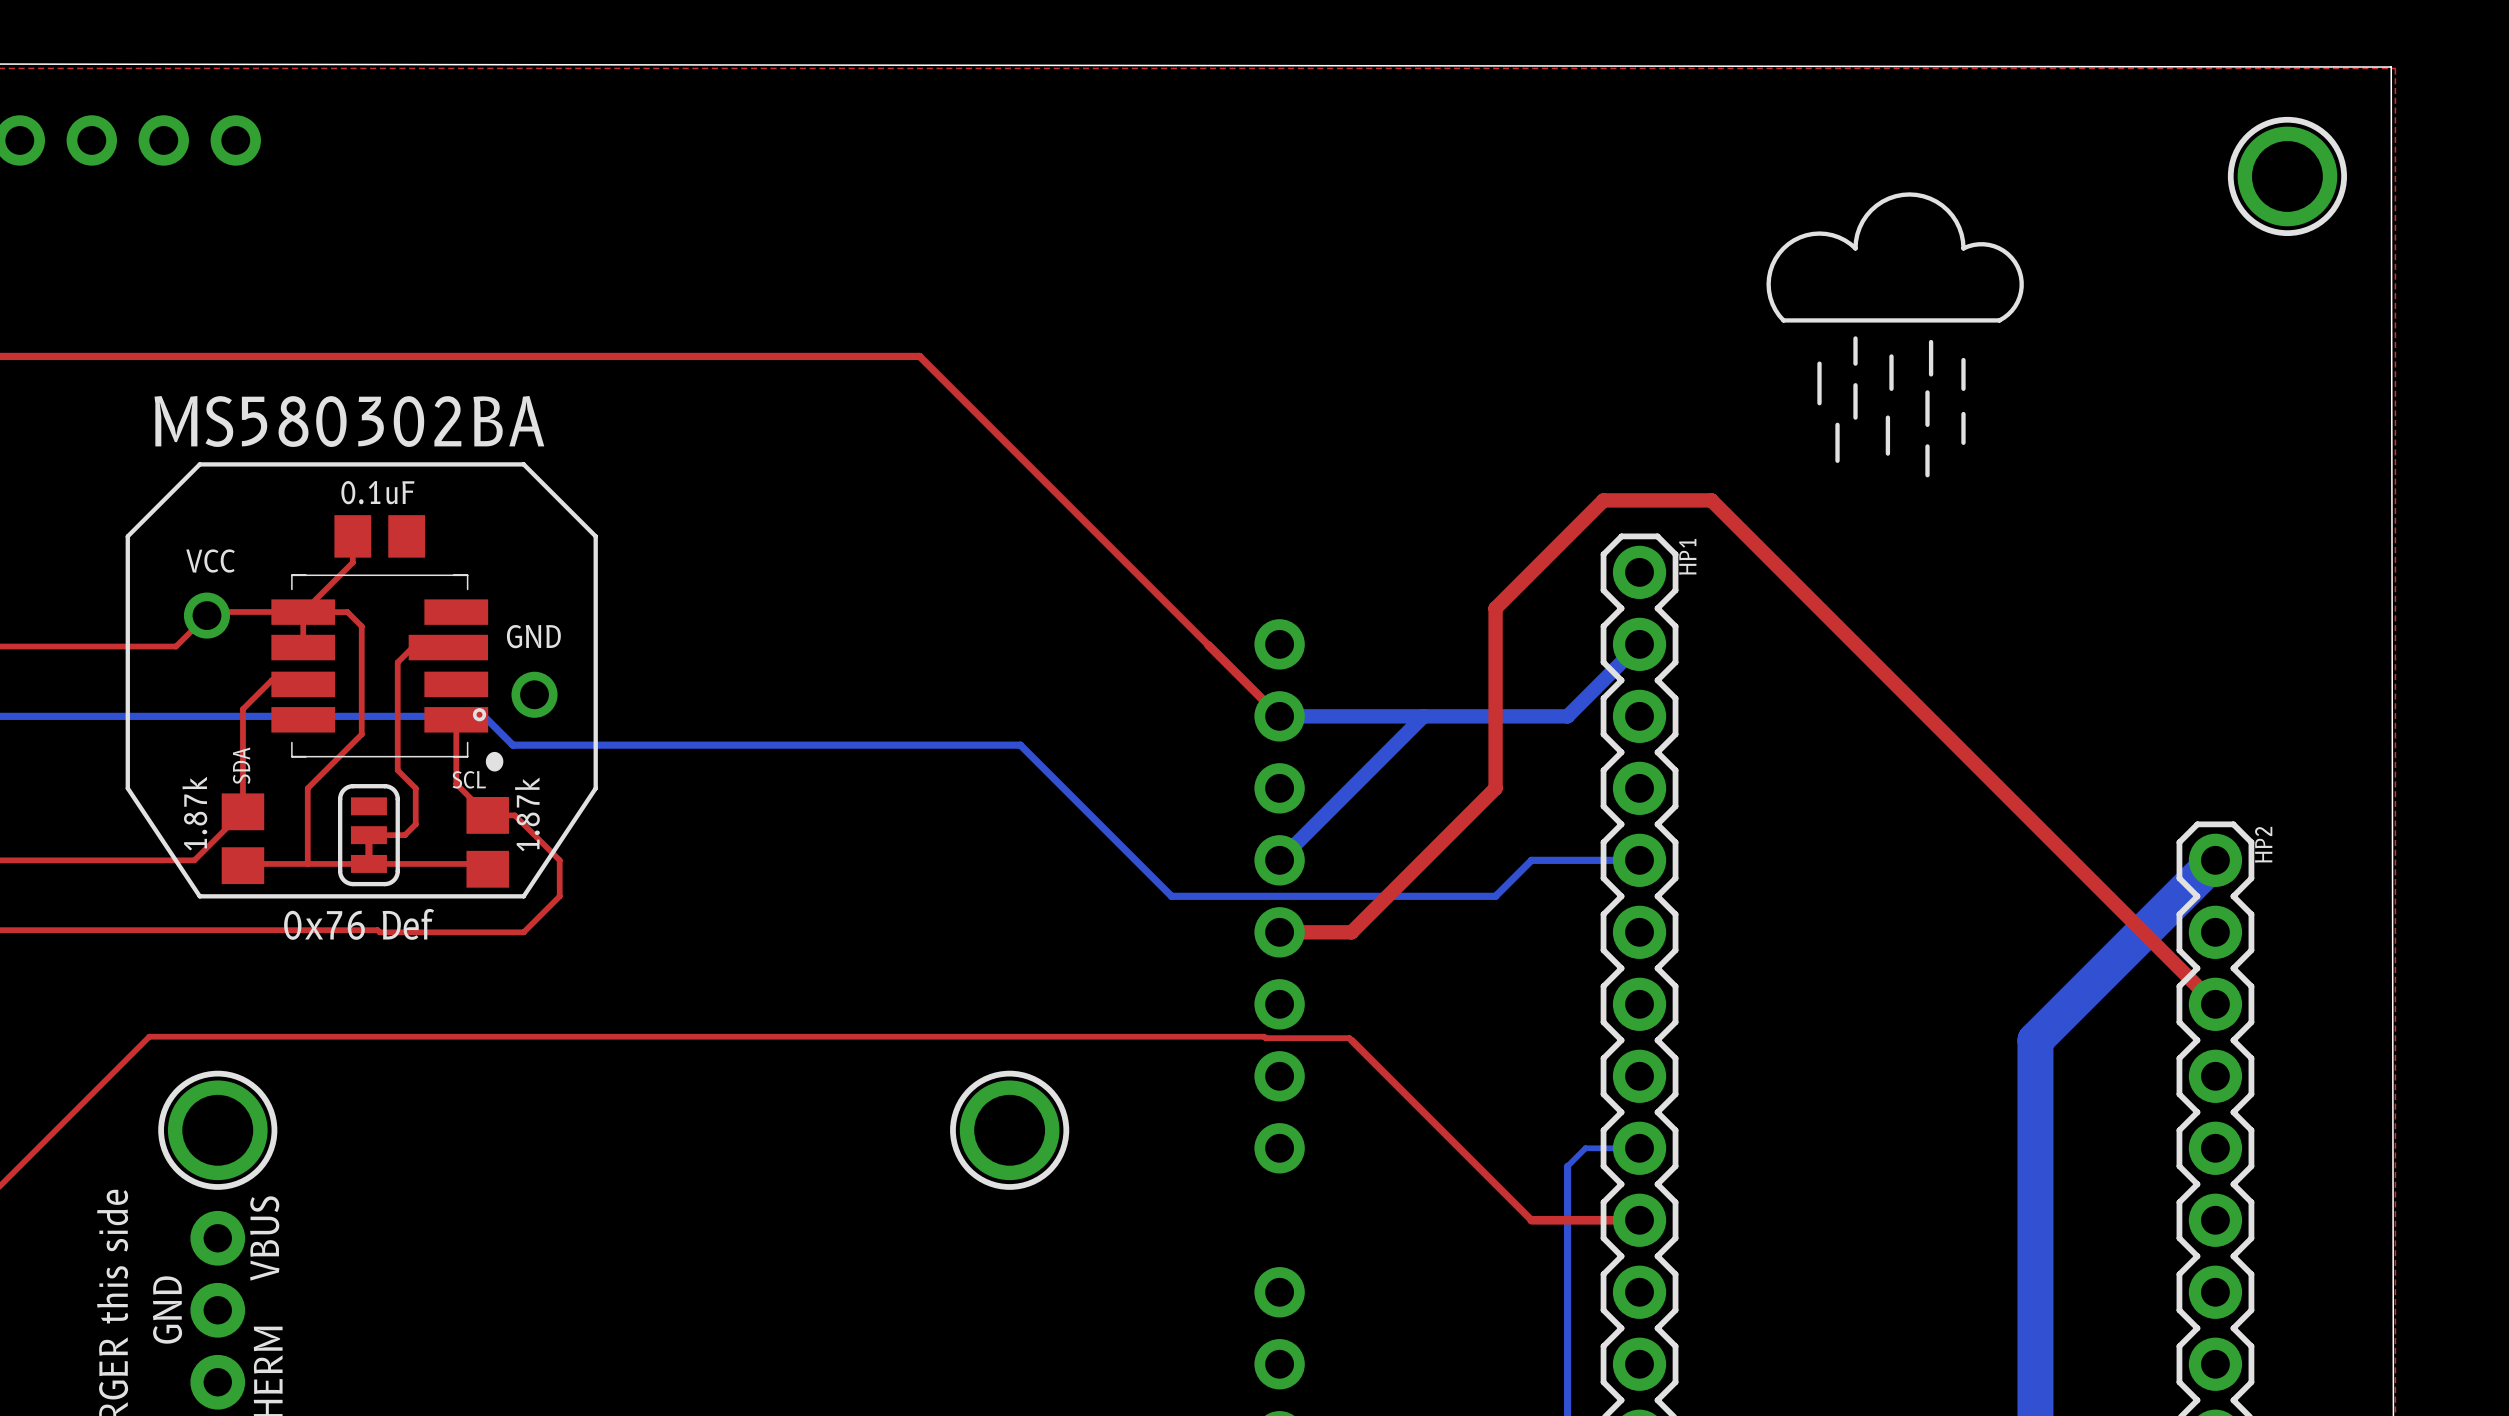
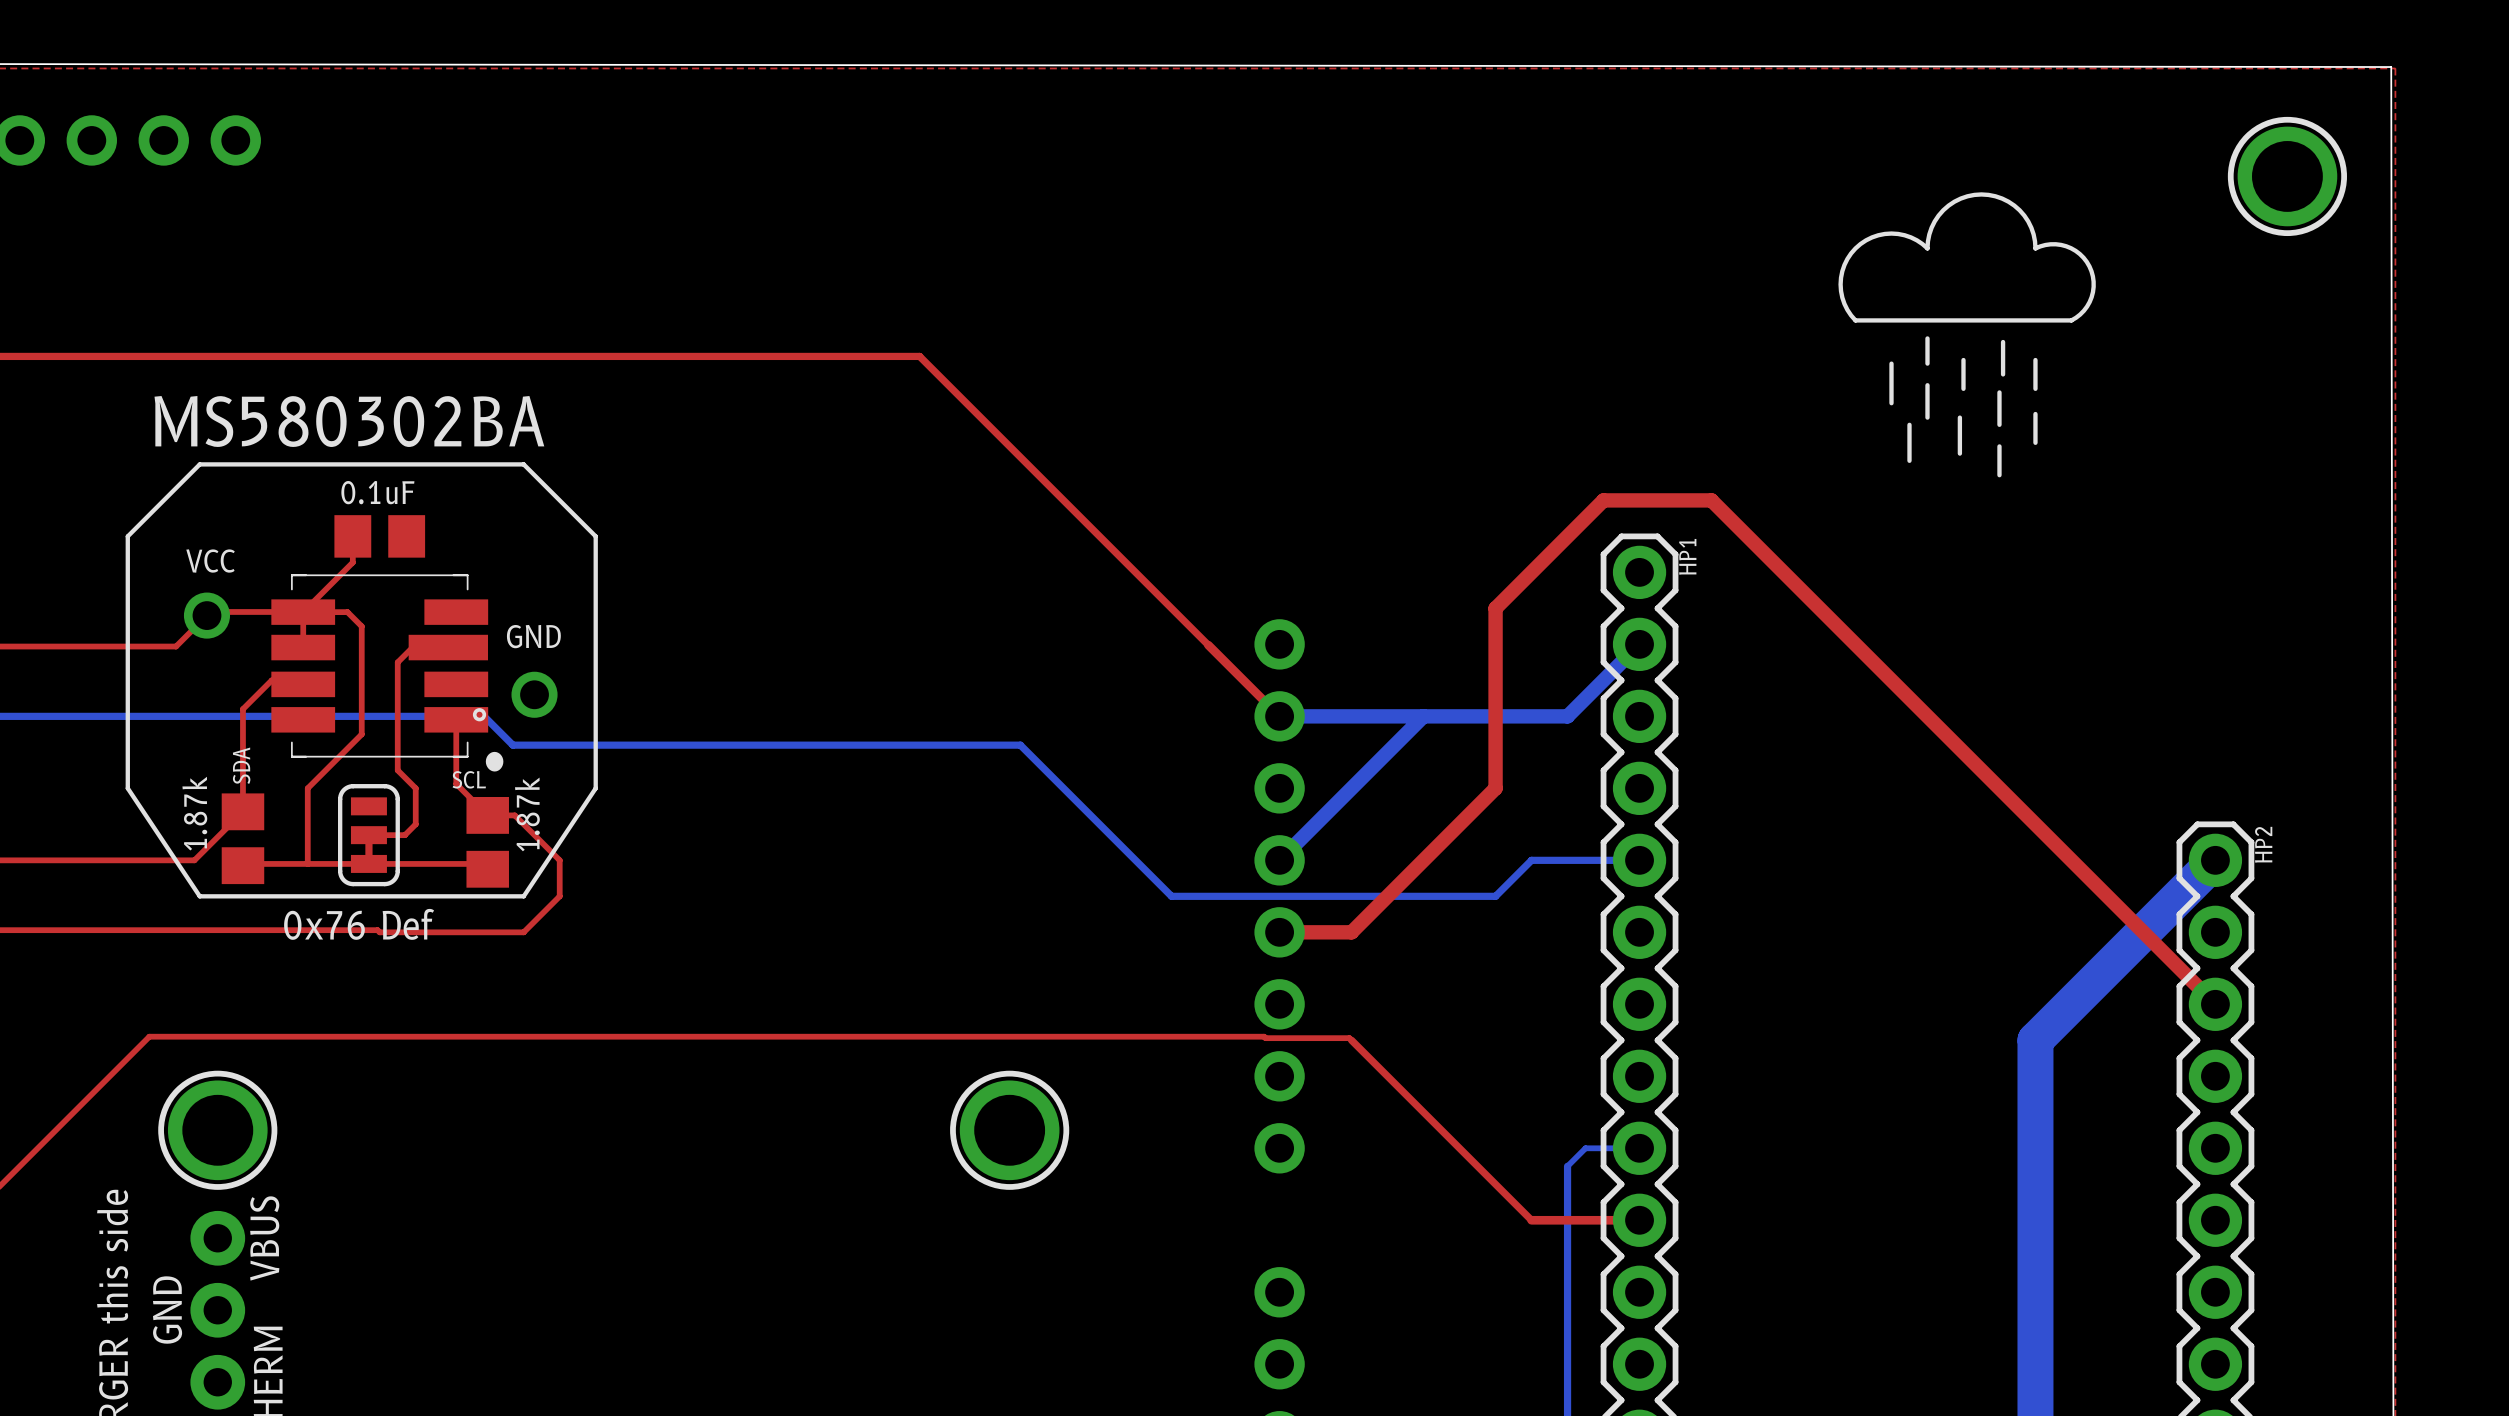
line: (1855, 320) (1783, 320) (1775, 309) (1770, 297) (1768, 284) (1772, 264) (1779, 253) (1788, 244) (1806, 235) (1819, 233) (1832, 235) (1844, 240) (1855, 248) (1859, 227) (1871, 210) (1888, 198) (1909, 194) (1930, 198) (1947, 210) (1959, 227) (1963, 248) (1973, 245) (1989, 244) (2003, 250) (2014, 261) (2020, 276) (2020, 292) (2015, 306) (1999, 320) -> (1855, 320) (1844, 303) (1840, 284) (1844, 264) (1855, 248) (1872, 237) (1891, 233) (1910, 237) (1927, 248) (1931, 227) (1943, 210) (1960, 198) (1981, 194) (2002, 198) (2019, 210) (2031, 227) (2035, 248) (2055, 244) (2071, 248) (2083, 257) (2092, 276) (2093, 286) (2089, 302) (2080, 314) (2071, 320) (1999, 320)
line: (1855, 338) (1855, 363) -> (1927, 338) (1927, 363)
line: (1931, 342) (1931, 374) -> (2003, 342) (2003, 374)
line: (1891, 356) (1891, 363) -> none
line: none -> (2035, 360) (2035, 388)
line: (1819, 363) (1819, 403) -> none
line: (1855, 385) (1855, 417) -> (1999, 392) (1999, 424)
line: none -> (1891, 388) (1891, 403)
line: (1963, 414) (1963, 442) -> (2035, 414) (2035, 442)
line: (1887, 417) (1887, 453) -> (1959, 417) (1959, 453)
line: (1927, 417) (1927, 424) -> (1927, 385) (1927, 392)
line: (1837, 424) (1837, 460) -> (1909, 424) (1909, 460)
line: (1927, 446) (1927, 475) -> (1999, 446) (1999, 475)

